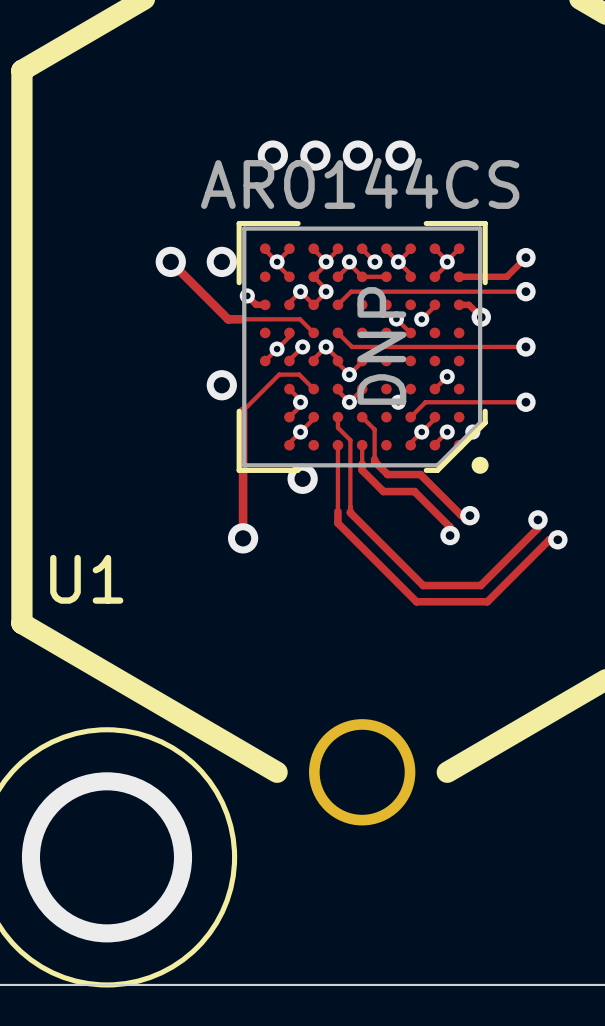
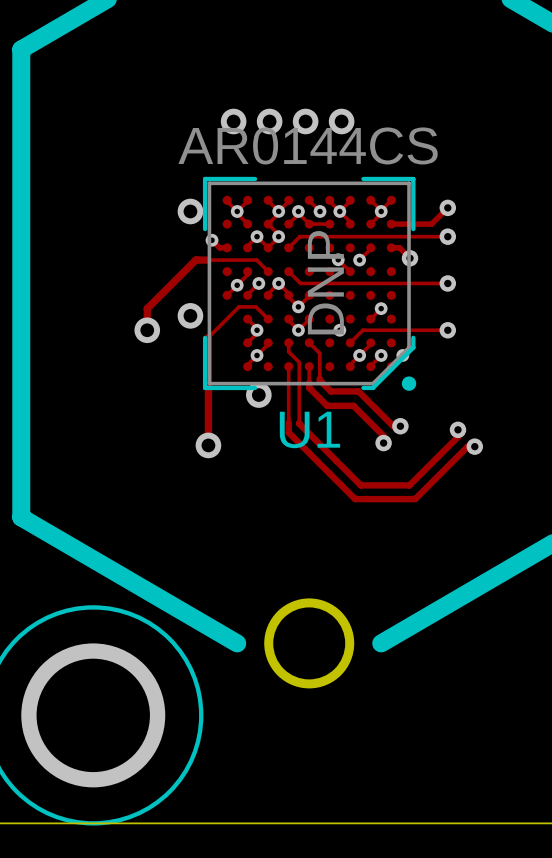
track: (170, 261) (228, 319) -> (147, 330) (147, 308) (195, 260)
via position: (170, 261) -> (147, 330)
U1 name position: U1 (86, 579) -> U1 (309, 429)

